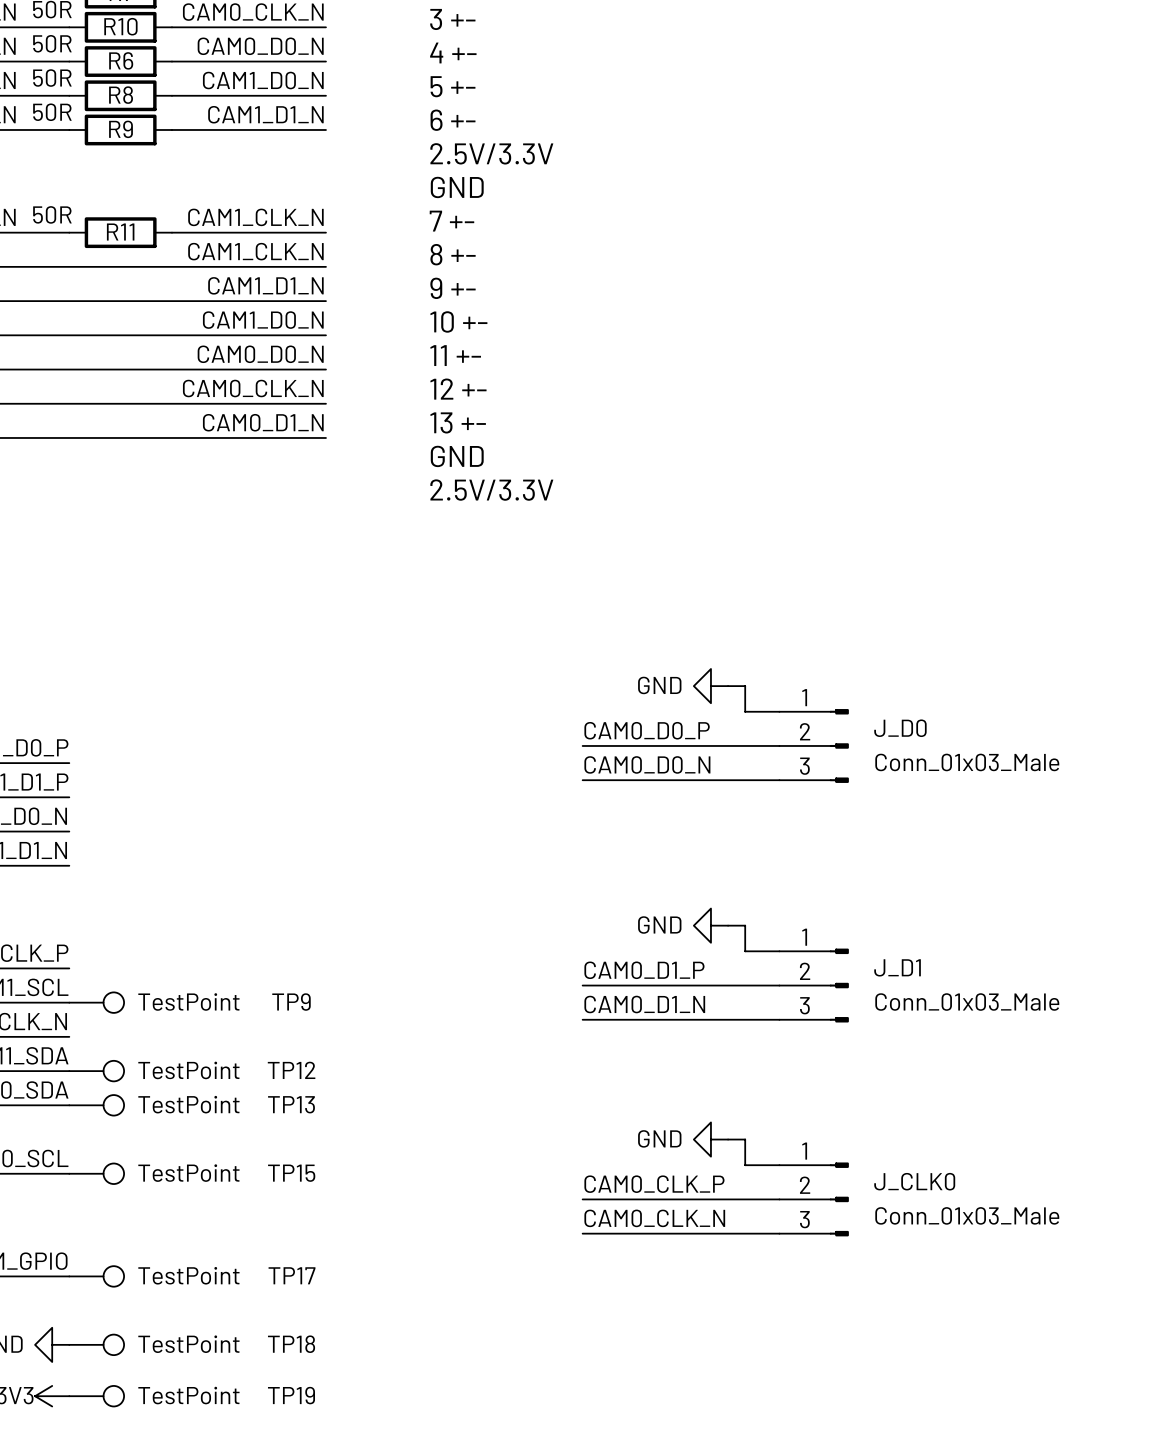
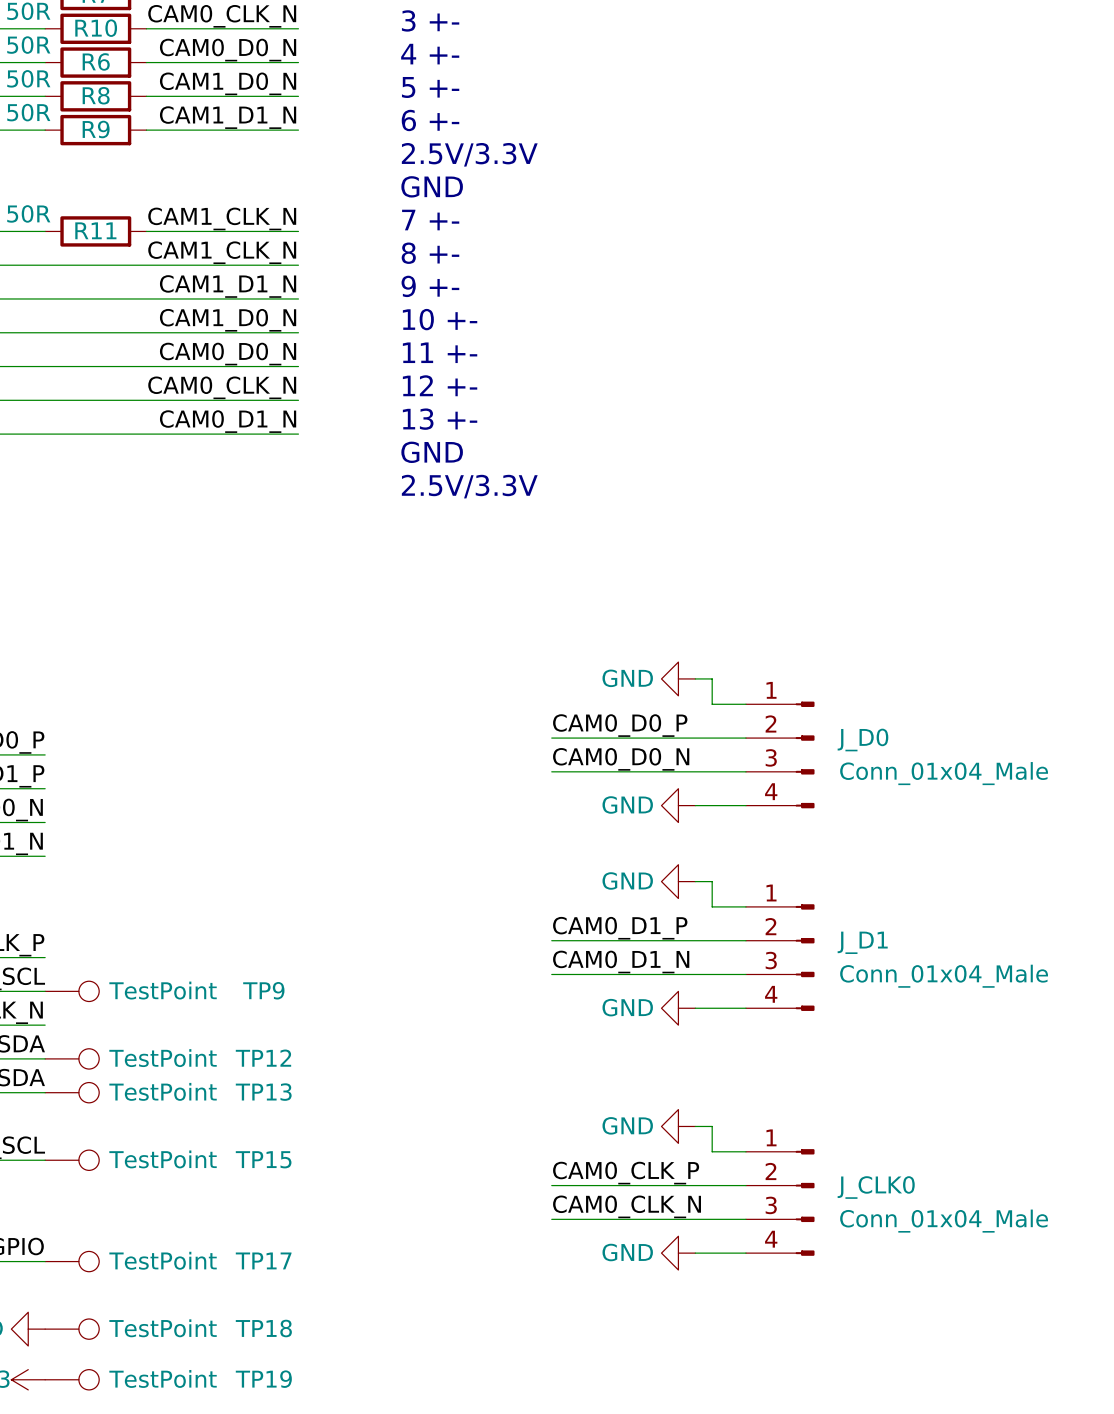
J_D0 symbol: [779, 709, 849, 783] -> [745, 701, 815, 809]
J_D0 value: Conn_01x03_Male (967, 762) -> Conn_01x04_Male (944, 773)
power symbol: none -> GND (678, 805)
wire: none -> (695, 805) (745, 805)
wire: none -> (695, 881) (712, 881) (712, 906) (745, 906)
power symbol position: GND (710, 925) -> GND (678, 881)
wire: (728, 925) (745, 925) (745, 951) -> (551, 940) (712, 940)
label: none -> CAM0_D1_P (620, 928)
J_D1 symbol: [779, 948, 849, 1023] -> [745, 904, 815, 1011]
label: CAM0_D1_P (644, 970) -> CAM0_D1_N (621, 961)
J_D1 value: Conn_01x03_Male (967, 1002) -> Conn_01x04_Male (944, 976)
label: CAM0_D1_N (644, 1004) -> none
wire: (582, 1019) (728, 1019) -> none
power symbol: none -> GND (678, 1008)
J_CLK0 symbol: [779, 1162, 849, 1237] -> [745, 1149, 815, 1256]
J_CLK0 value: Conn_01x03_Male (967, 1215) -> Conn_01x04_Male (944, 1221)
power symbol: none -> GND (678, 1253)
wire: none -> (695, 1253) (745, 1253)

